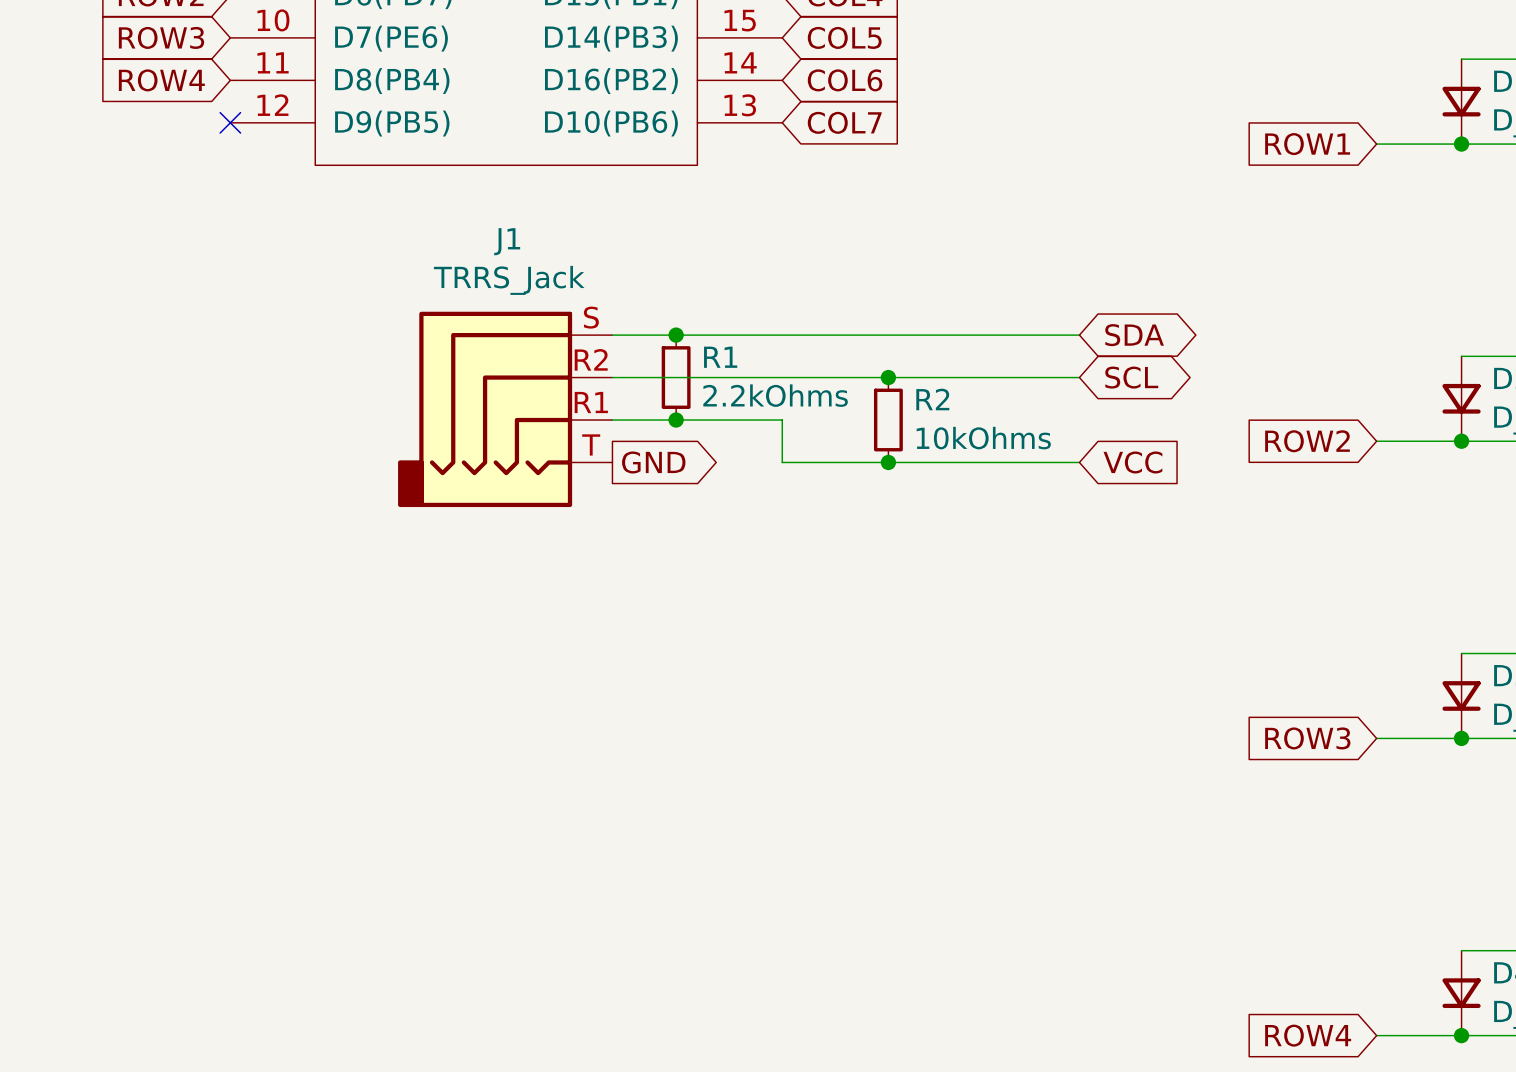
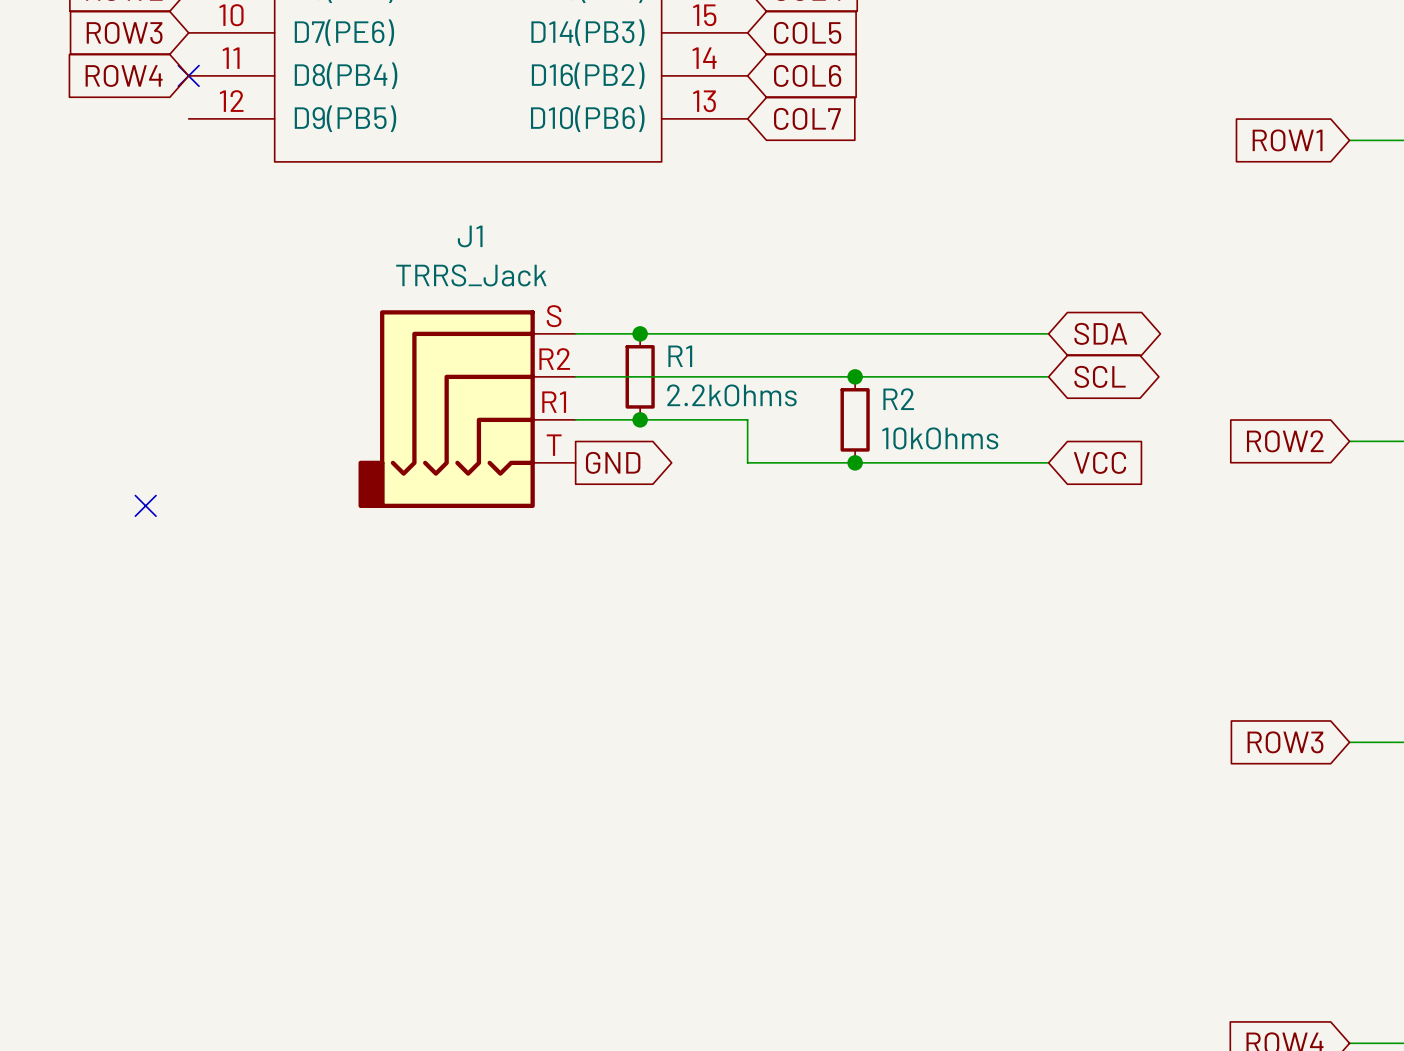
no-connect mark position: (230, 122) -> (188, 75)
no-connect mark: none -> (145, 505)

